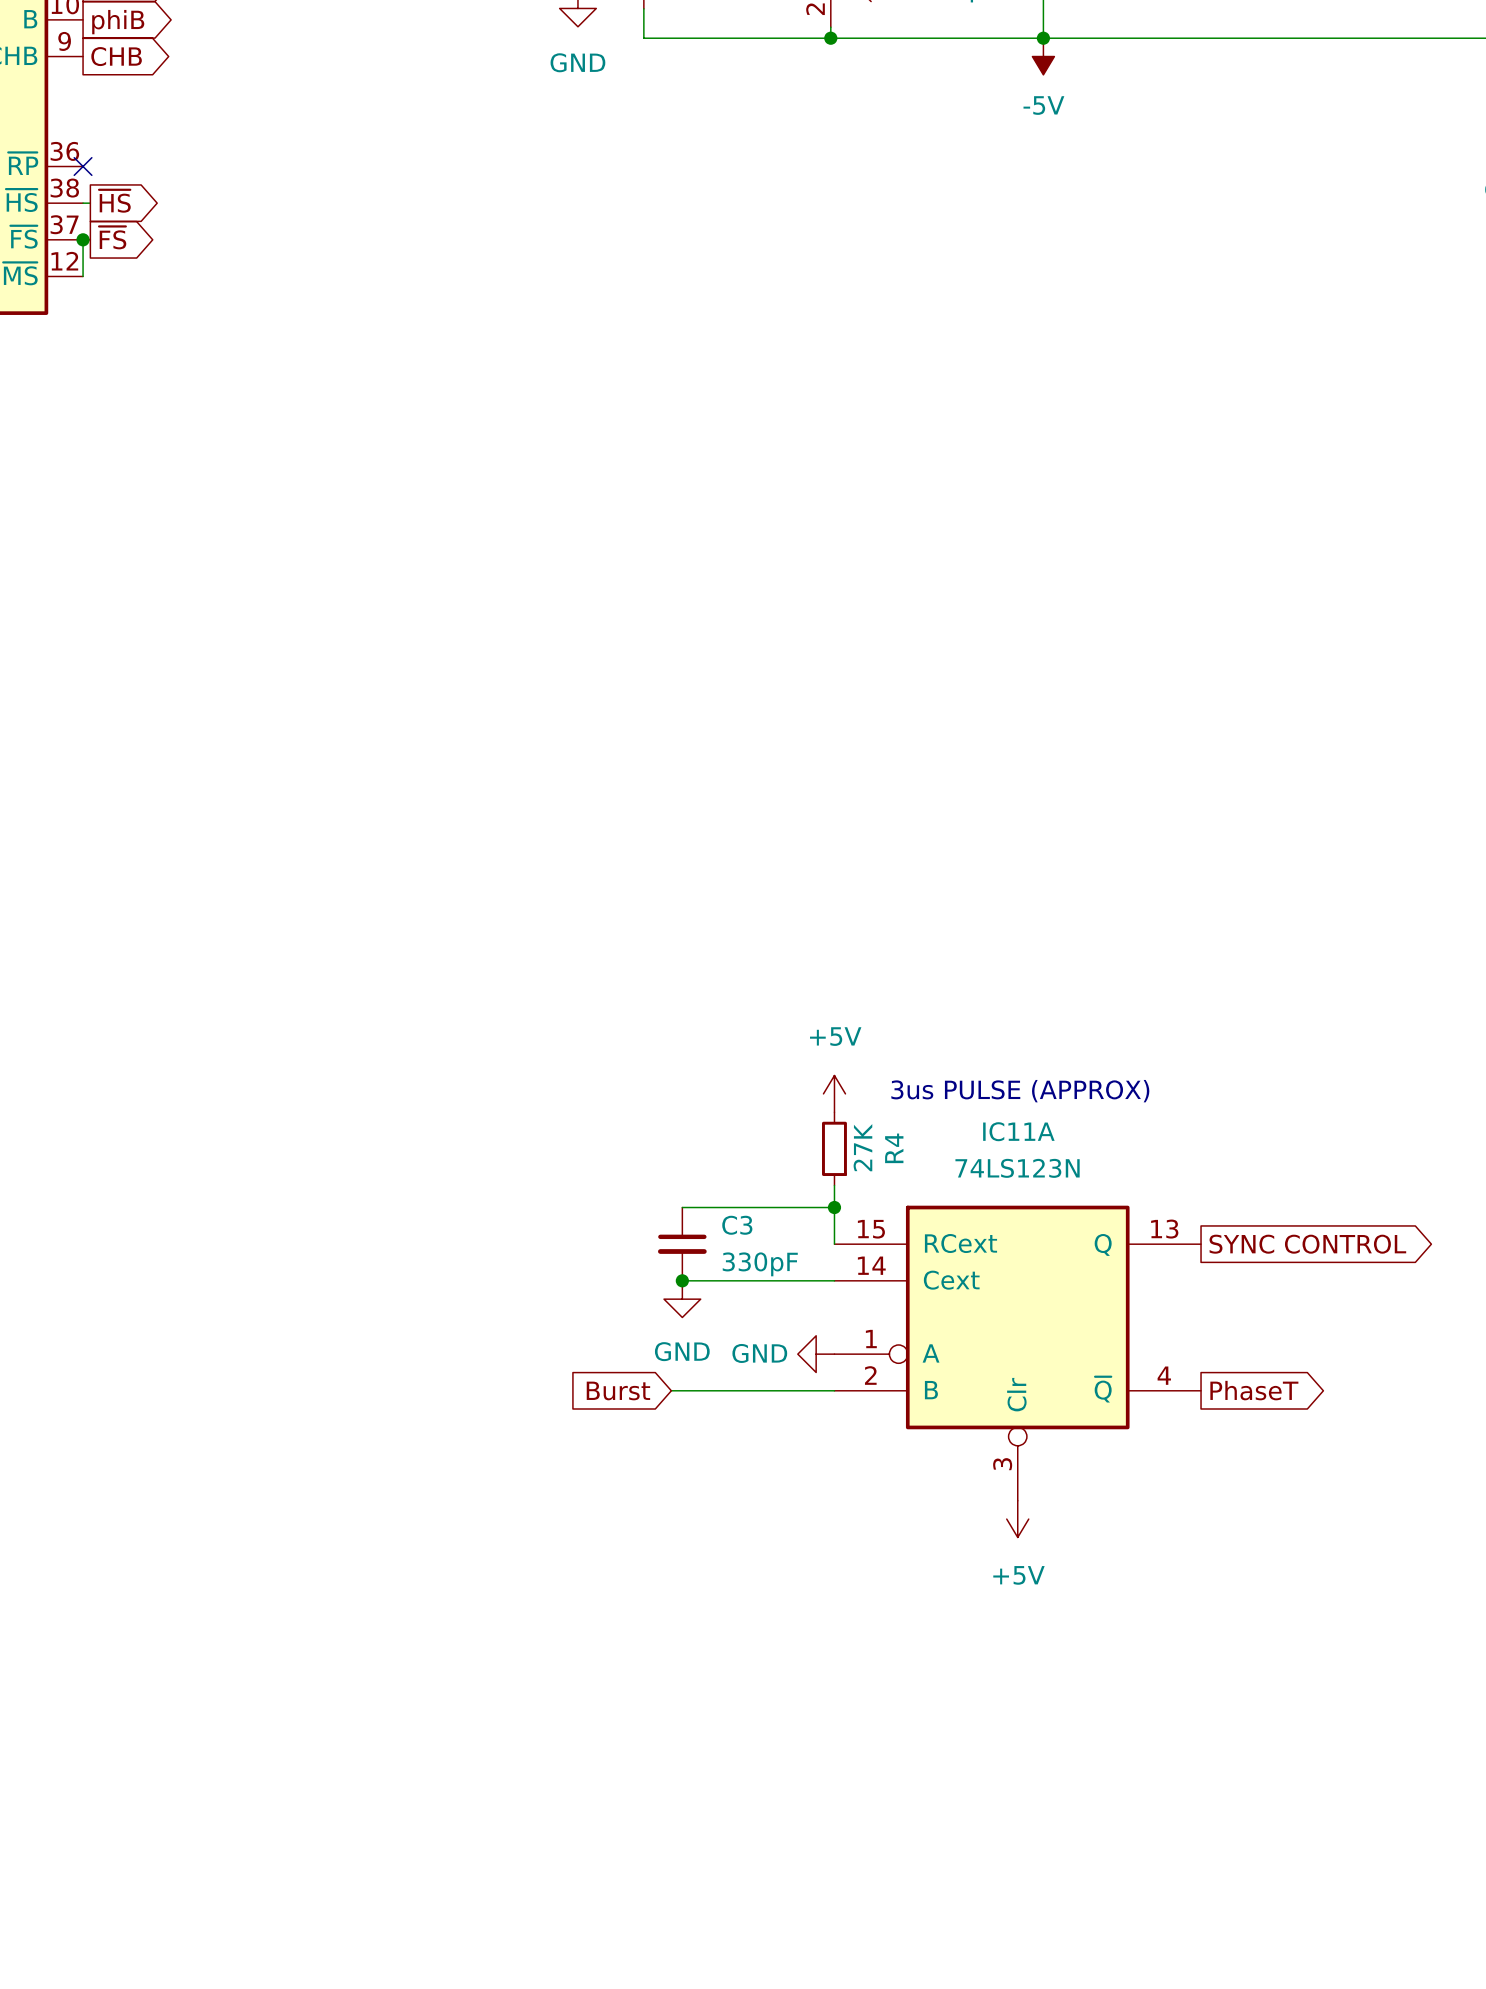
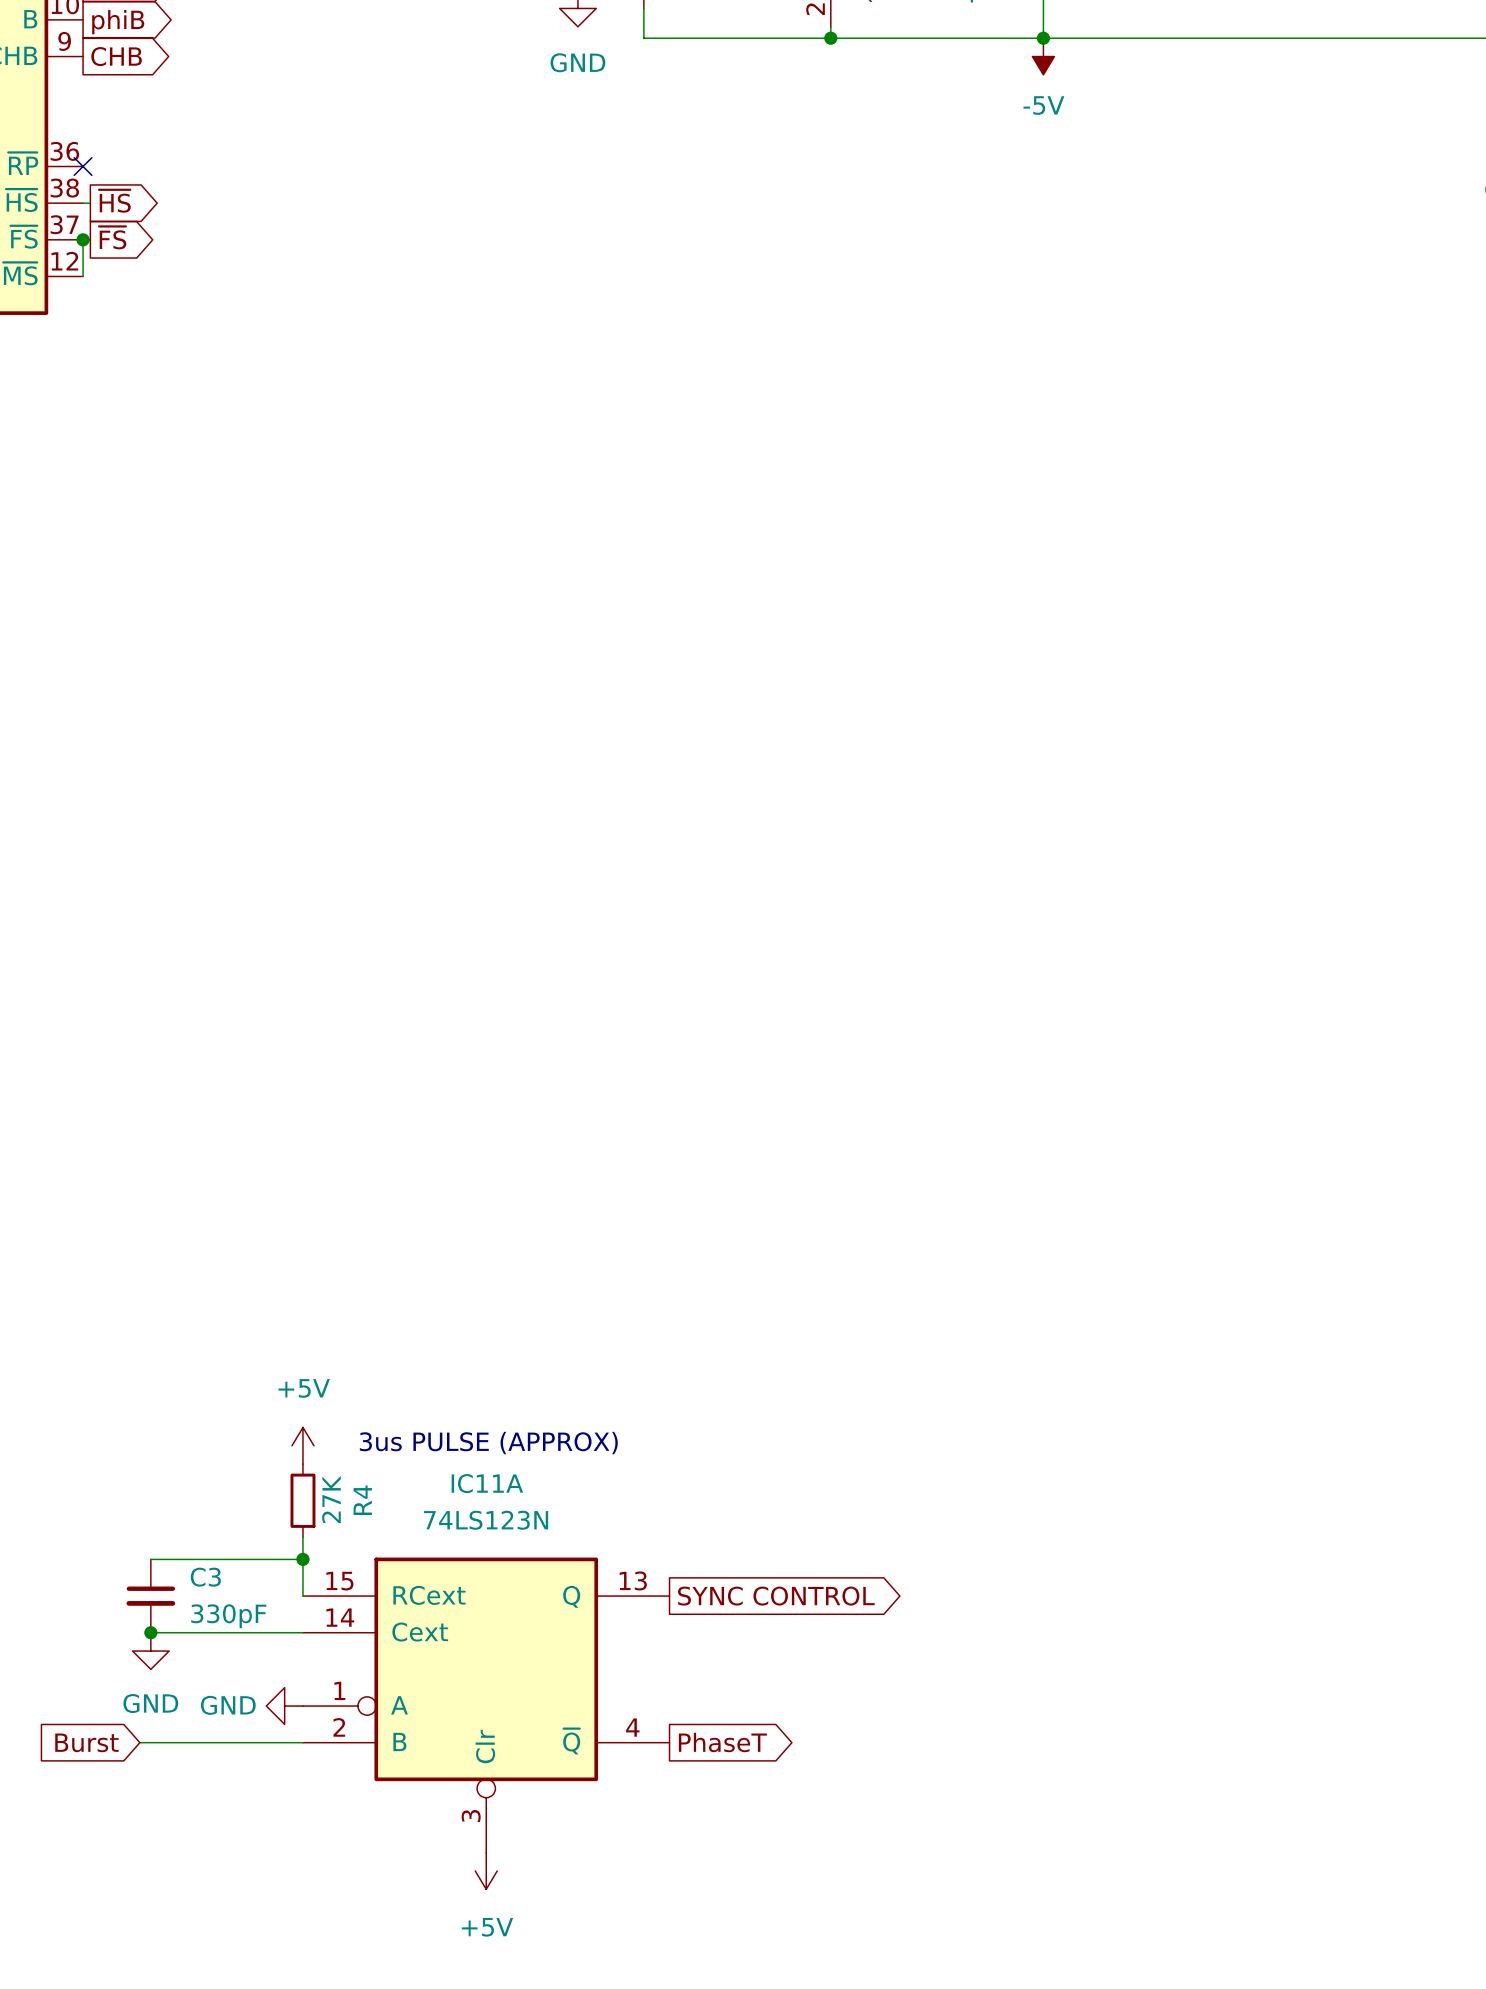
text: 3us PULSE (APPROX) (1020, 1091) -> none
power symbol: +5V (834, 1093) -> none
R4 position: (834, 1148) -> (302, 1500)
wire: (834, 1185) (834, 1244) -> none
wire: (682, 1207) (834, 1207) -> none
junction: (834, 1207) -> none
C3 position: (682, 1244) -> (150, 1596)
global label: SYNC CONTROL (1307, 1244) -> none
wire: (682, 1280) (834, 1280) -> none
junction: (682, 1280) -> none
power symbol: GND (682, 1299) -> none
IC11A position: (1017, 1353) -> (486, 1705)
power symbol: GND (816, 1354) -> none
global label: Burst (618, 1390) -> none
wire: (671, 1390) (834, 1390) -> none
global label: PhaseT (1254, 1390) -> none
text: none -> 3us PULSE (APPROX) (488, 1443)
power symbol: none -> +5V (302, 1445)
power symbol: +5V (1017, 1519) -> none
wire: none -> (302, 1537) (302, 1596)
wire: none -> (150, 1559) (302, 1559)
junction: none -> (302, 1559)
global label: none -> SYNC CONTROL (776, 1596)
wire: none -> (150, 1632) (302, 1632)
junction: none -> (150, 1632)
power symbol: none -> GND (150, 1651)
power symbol: none -> GND (284, 1706)
global label: none -> Burst (86, 1742)
wire: none -> (139, 1742) (302, 1742)
global label: none -> PhaseT (722, 1742)
power symbol: none -> +5V (486, 1870)

